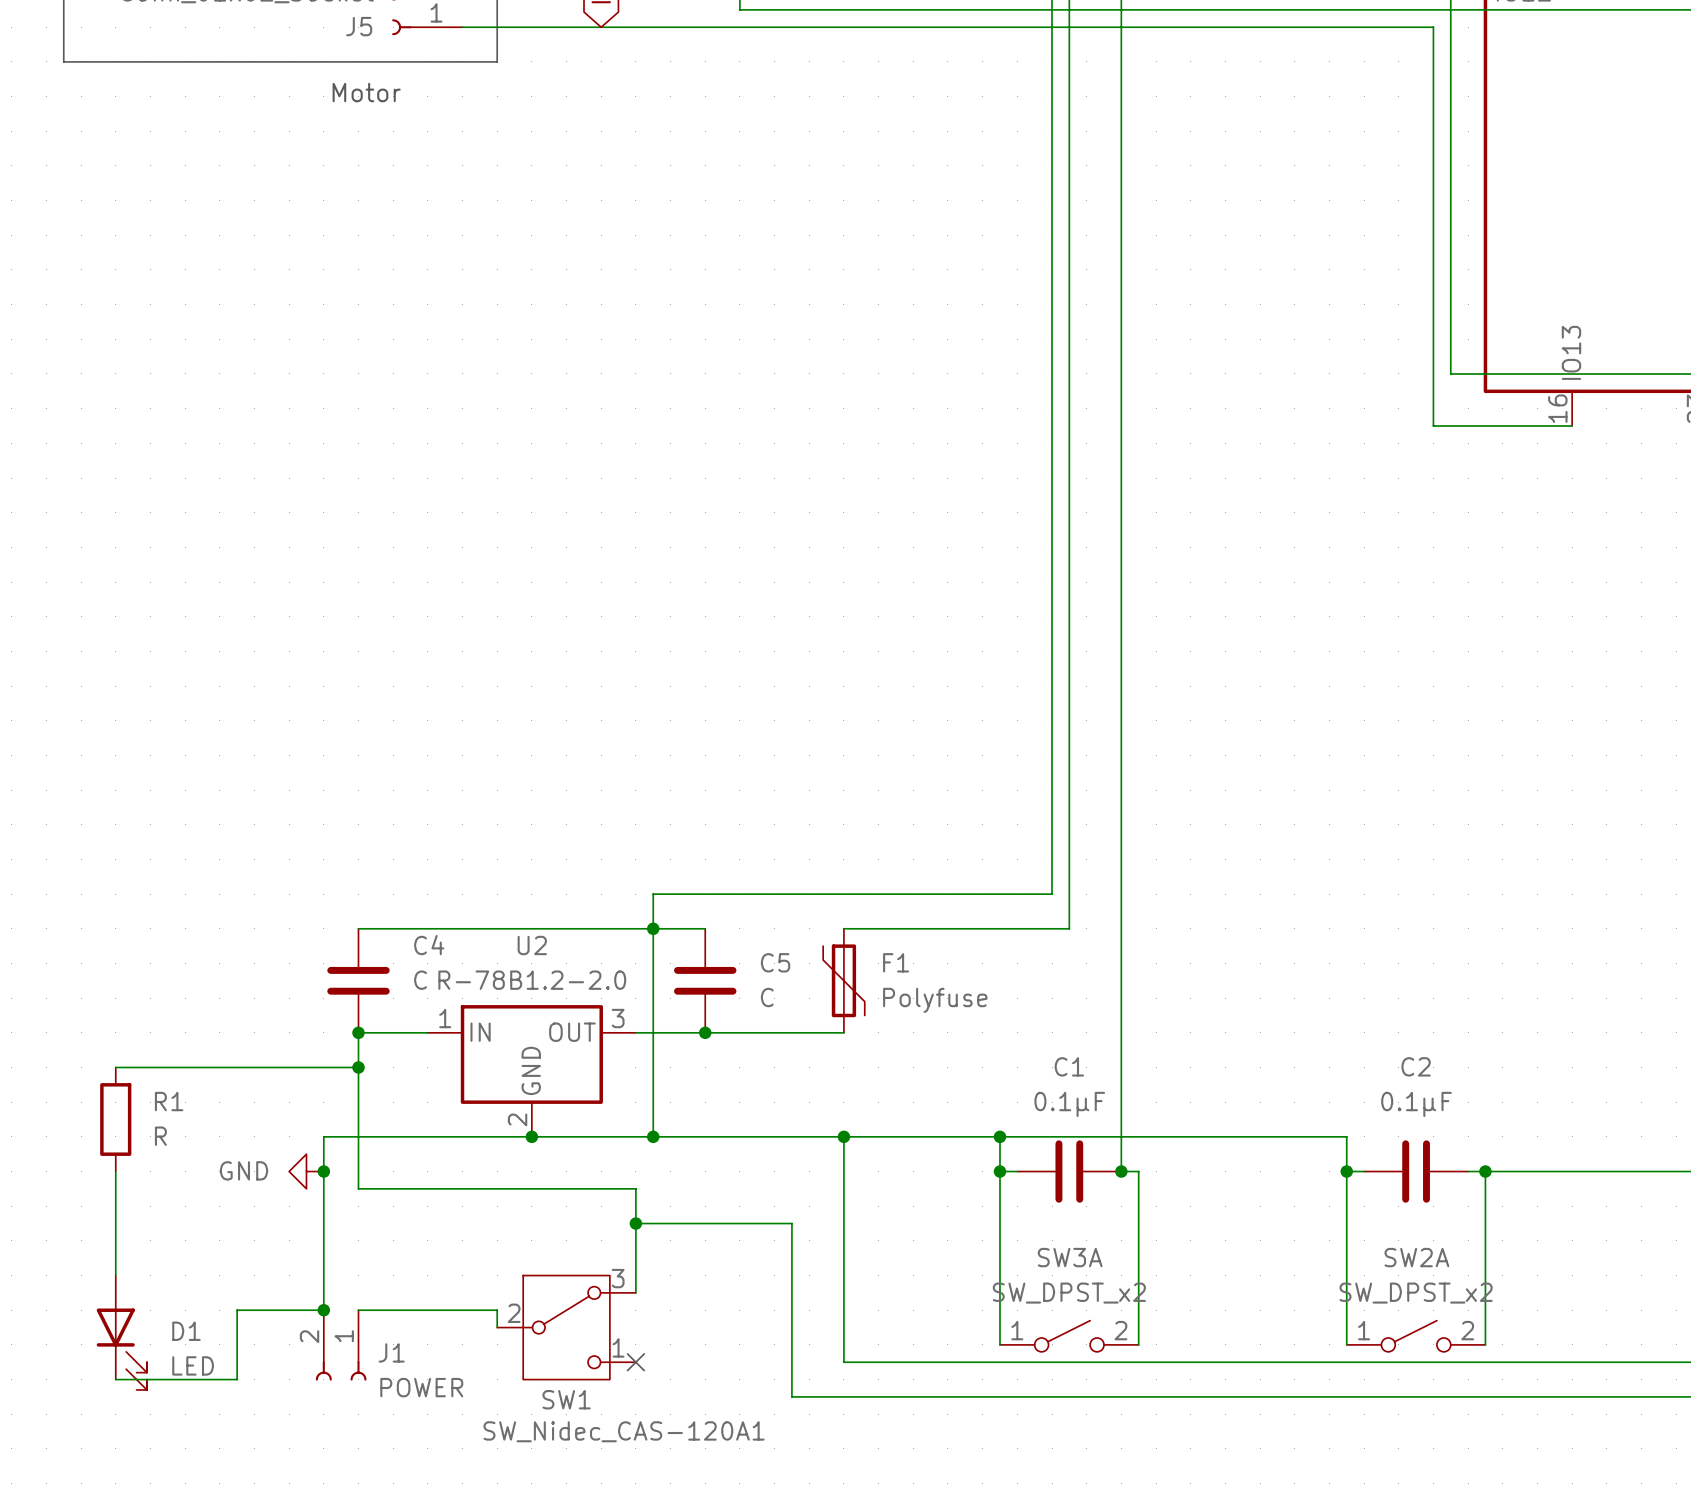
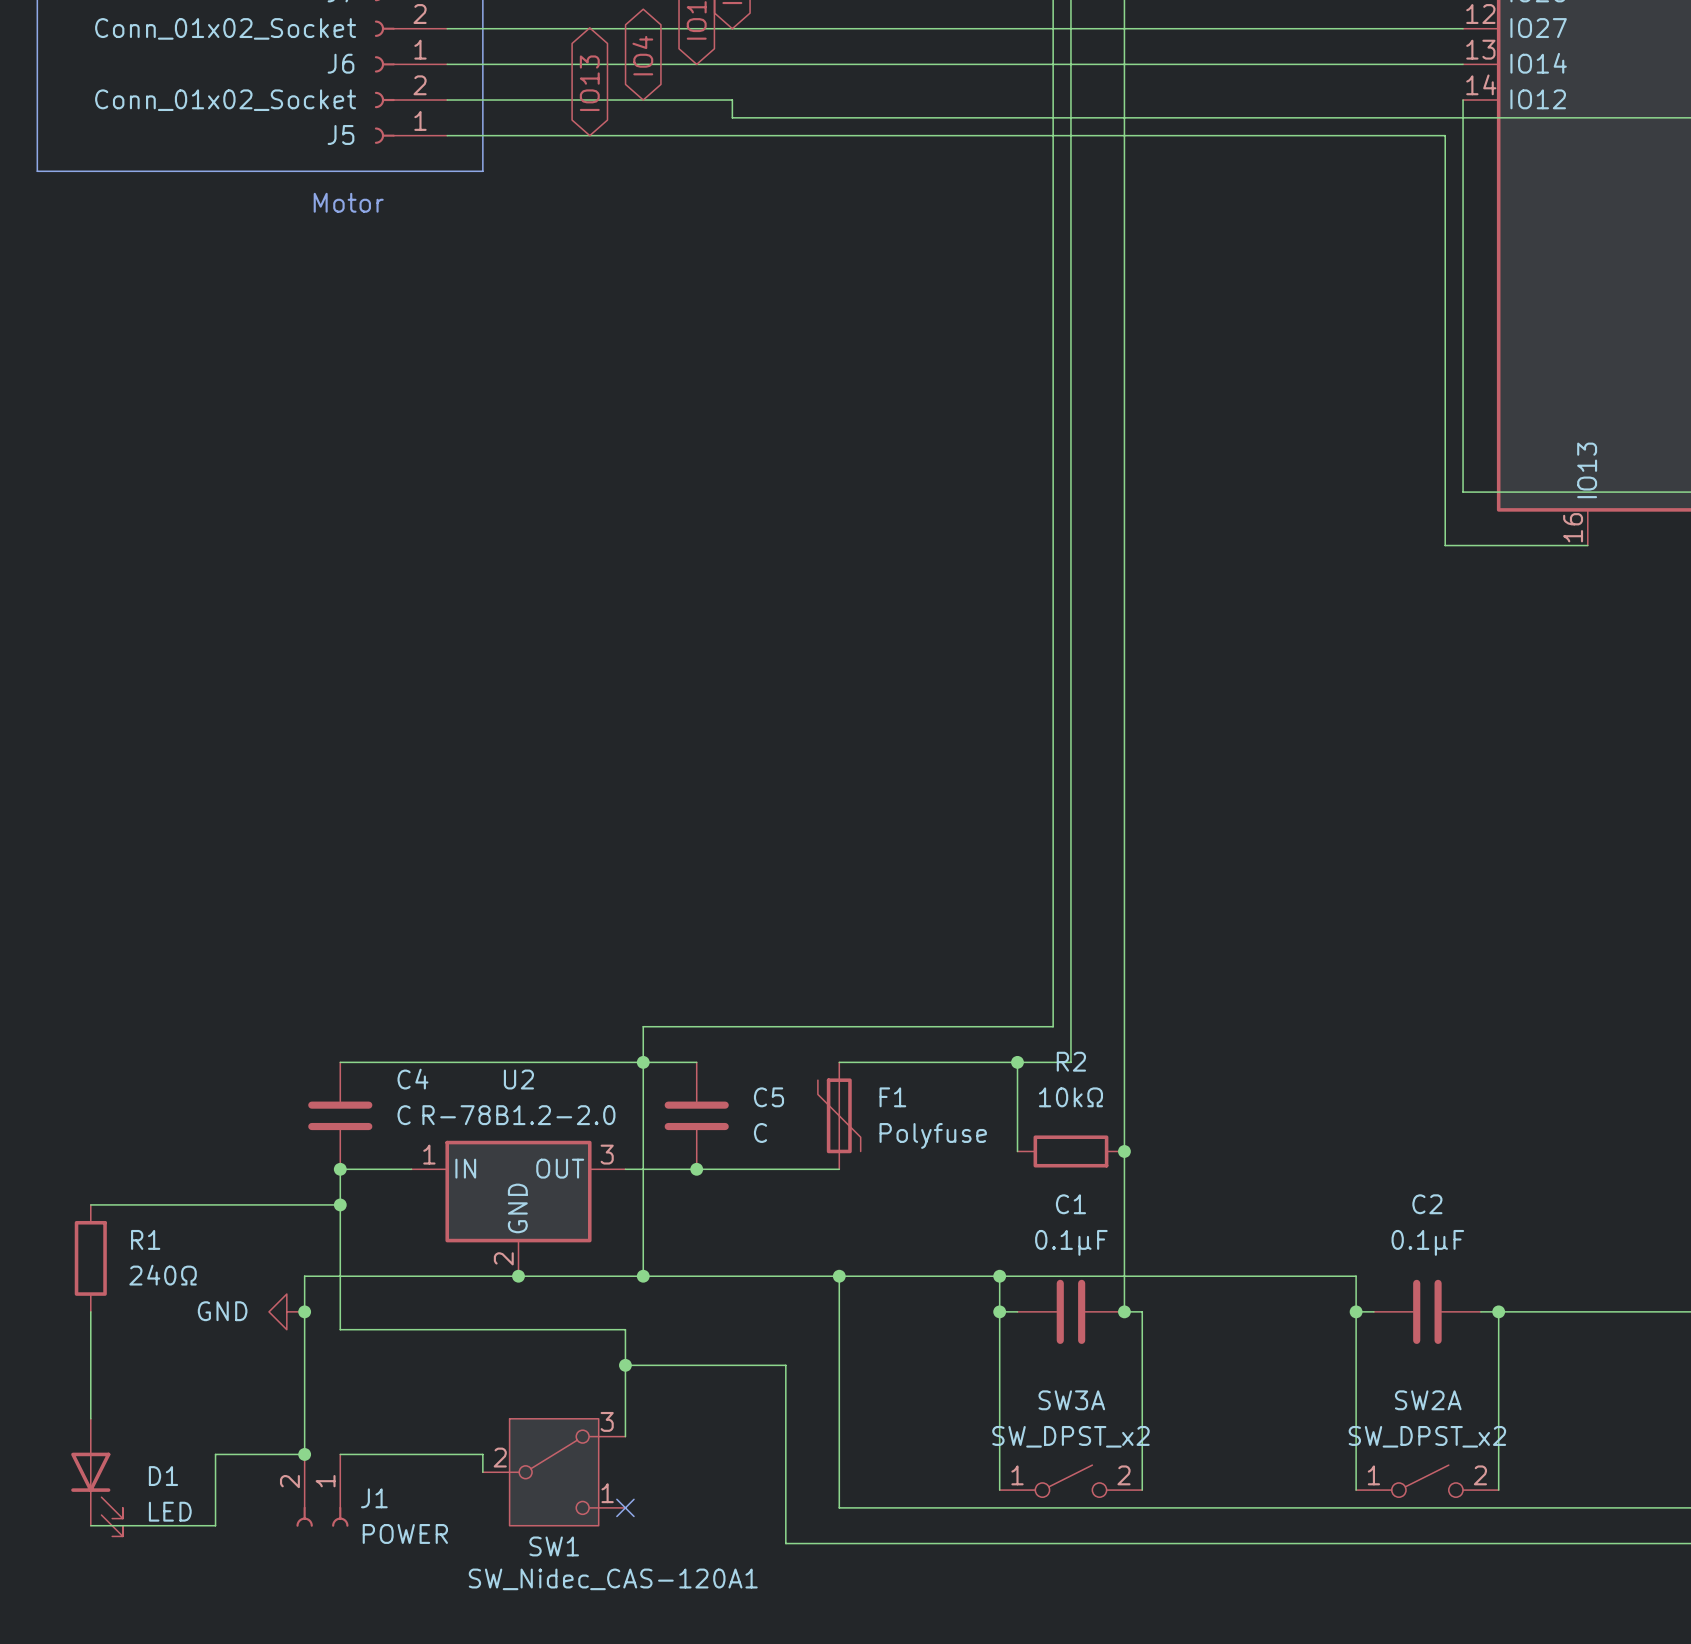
wire: none -> (1017, 1062) (1017, 1151)
junction: none -> (1017, 1062)
R2: none -> 10kΩ (1070, 1151)
junction: none -> (1124, 1151)
R1 value: R (160, 1136) -> 240Ω (163, 1275)

